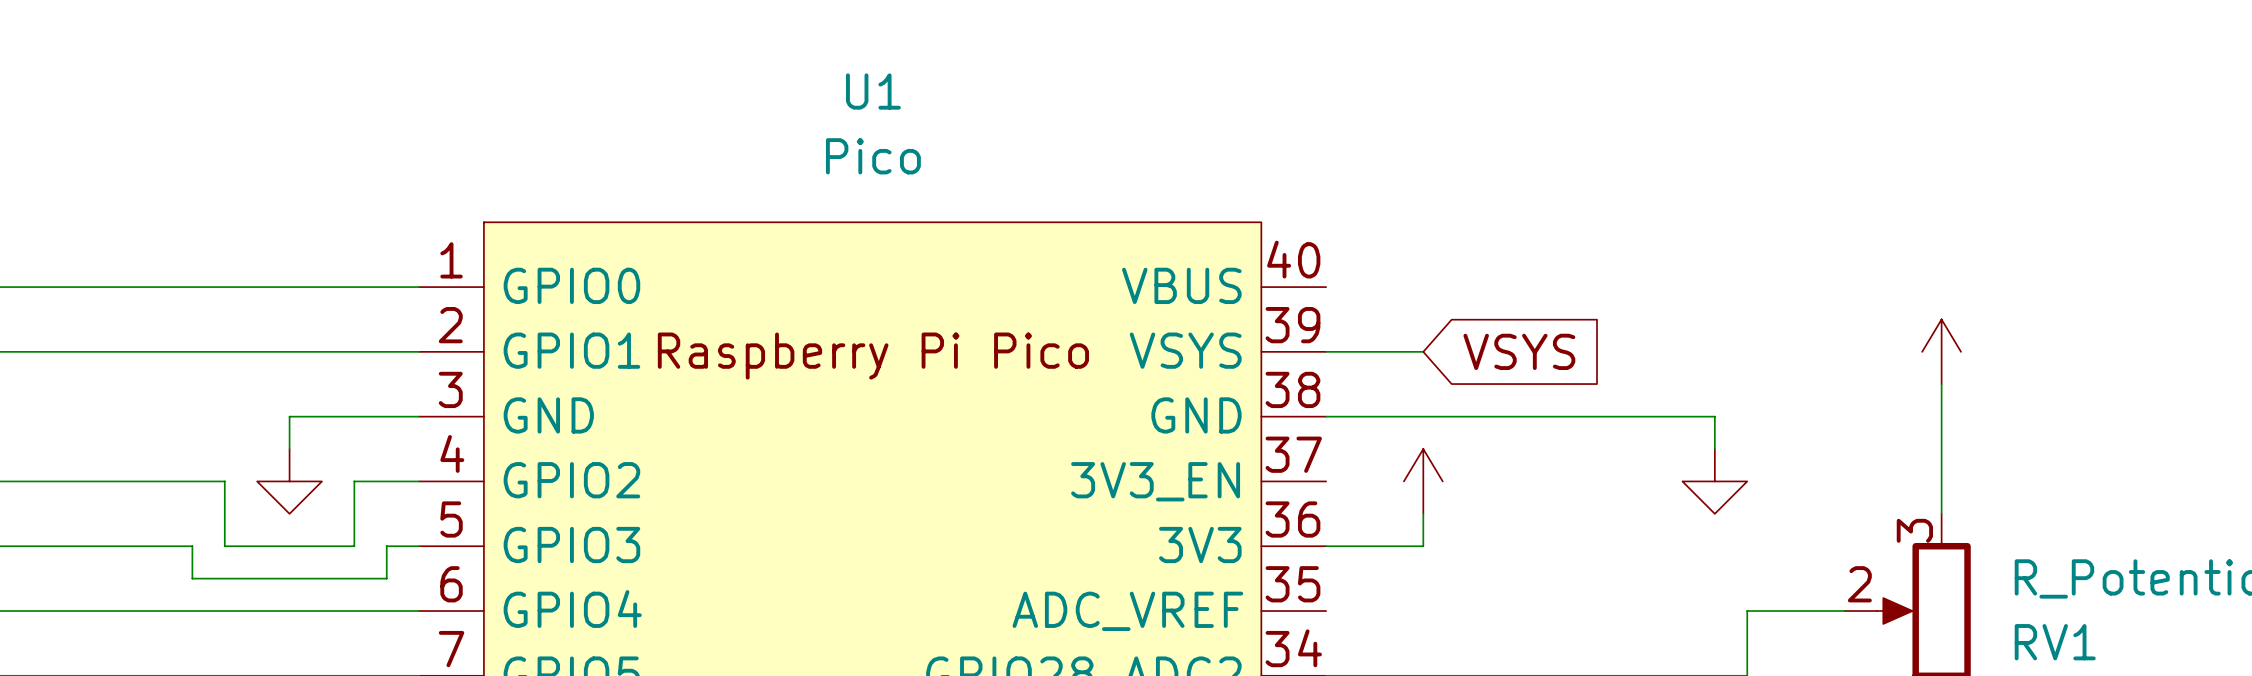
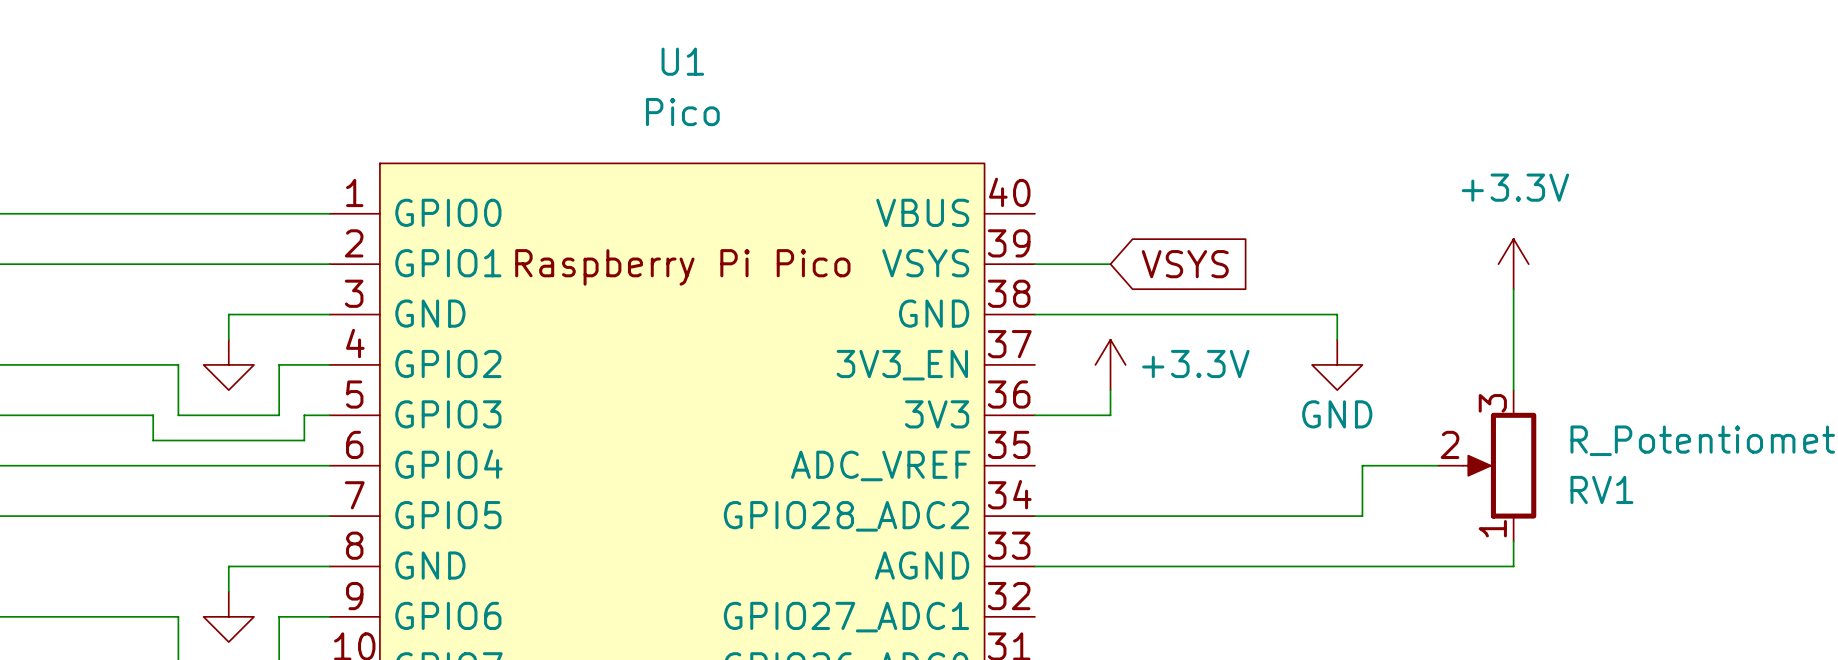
power symbol text: none -> +3.3V (1515, 187)
power symbol text: none -> +3.3V (1195, 363)
power symbol text: none -> GND (1337, 414)

